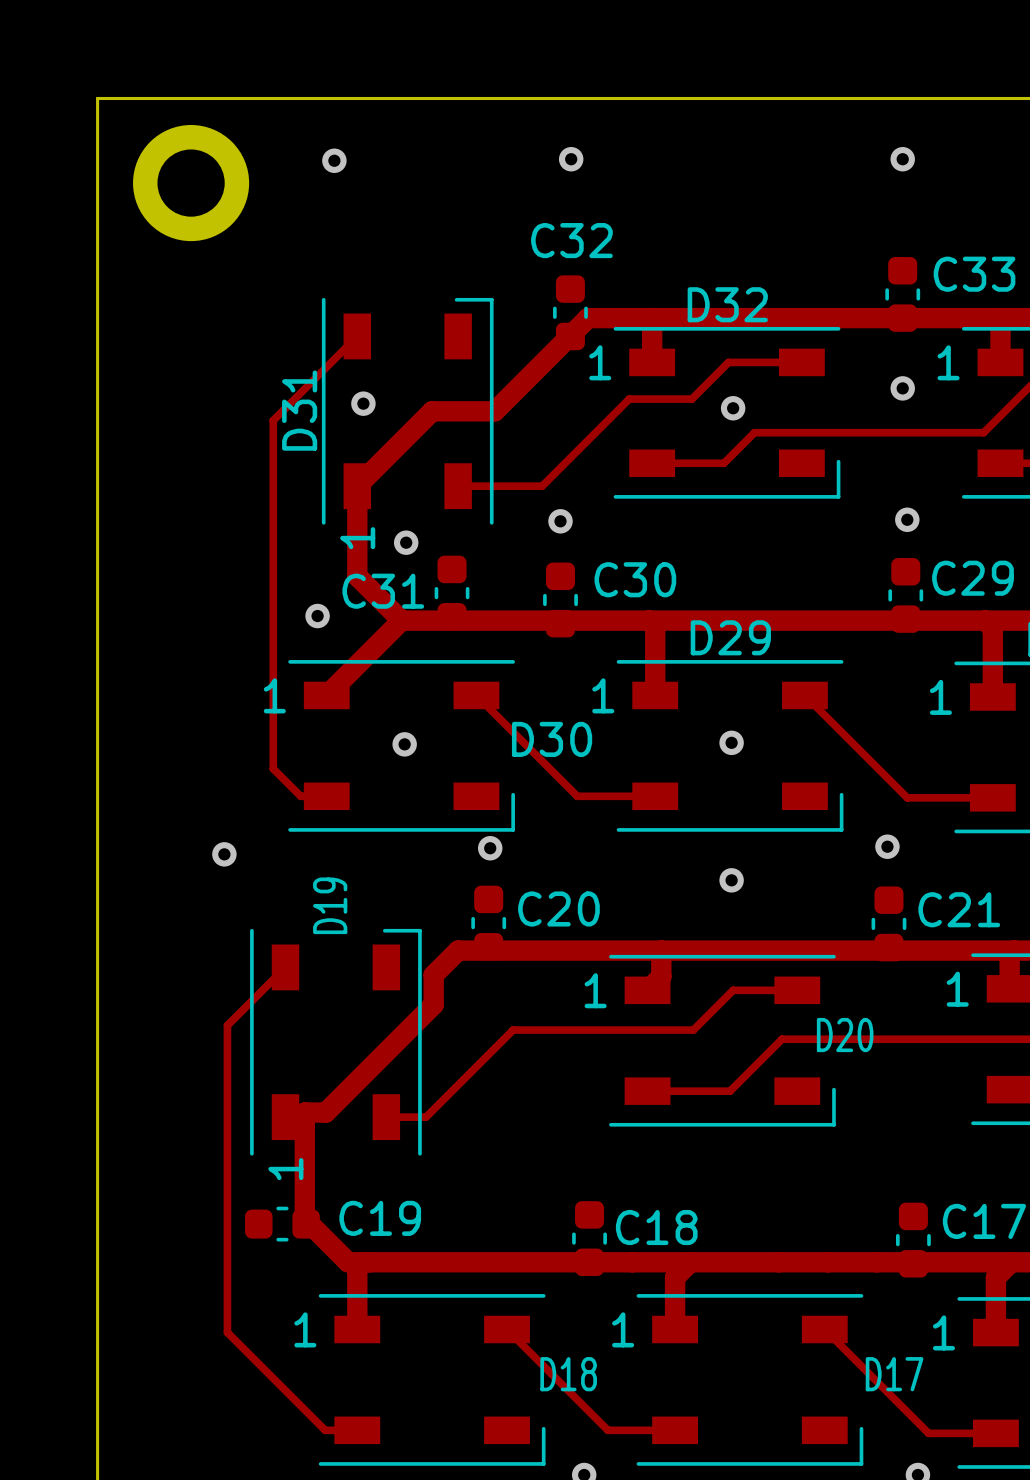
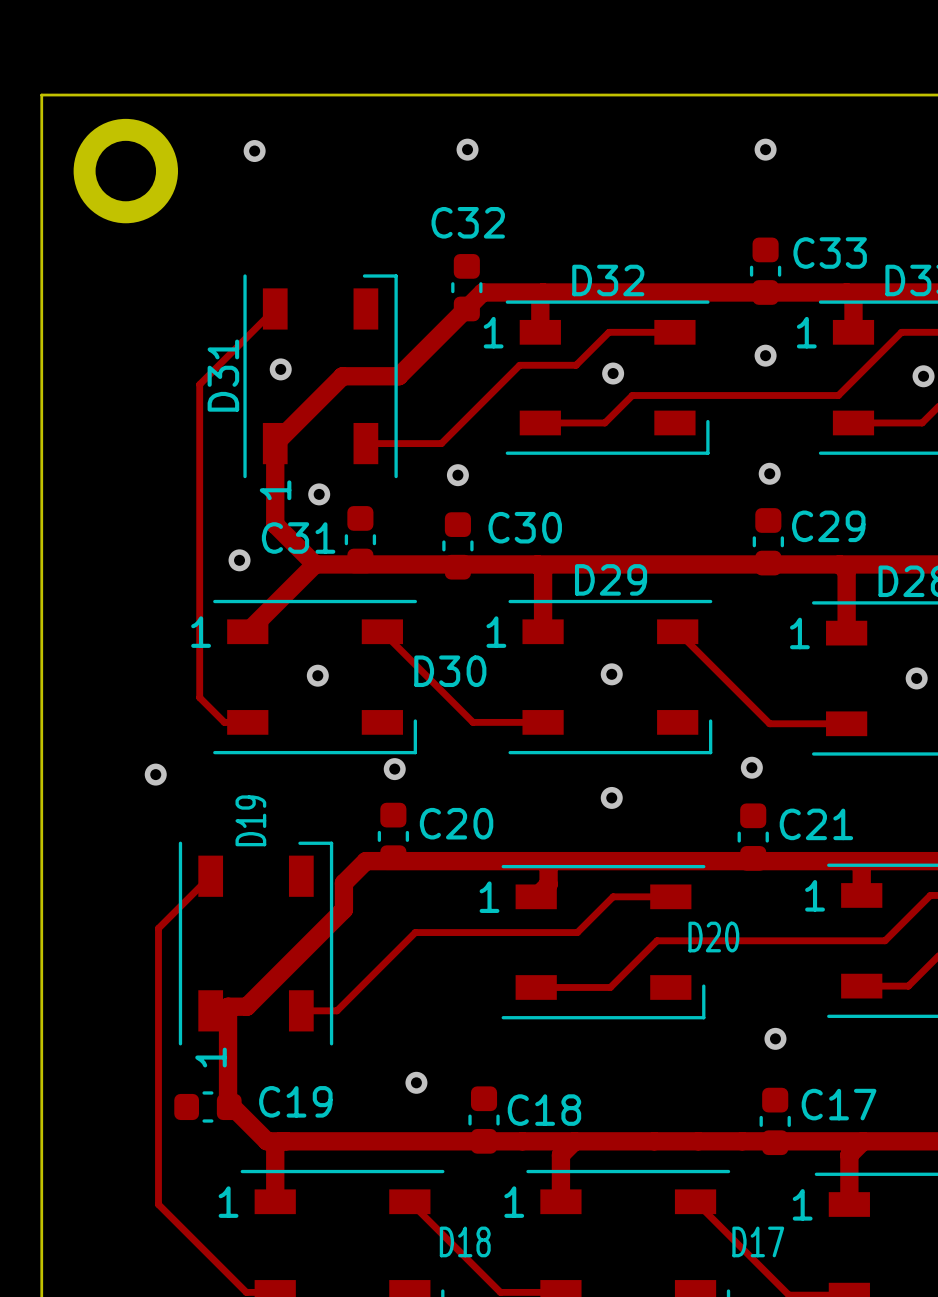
via: none -> (775, 1038)
via: none -> (416, 1082)

